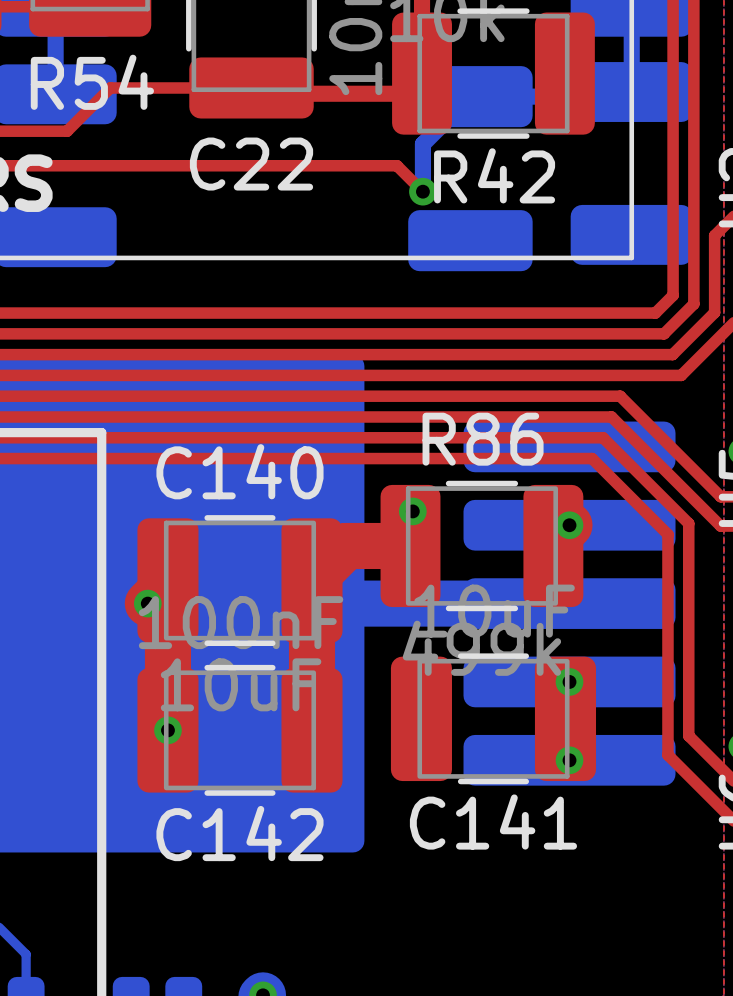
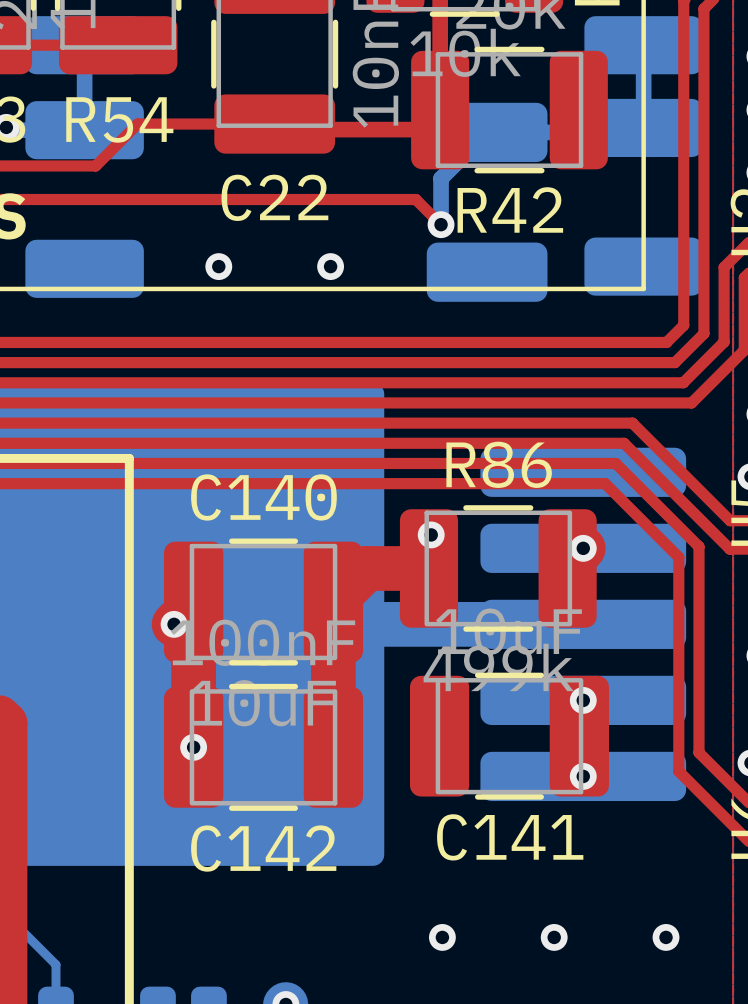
via: none -> (218, 266)
via: none -> (330, 266)
via: none -> (442, 937)
via: none -> (554, 937)
via: none -> (666, 937)

